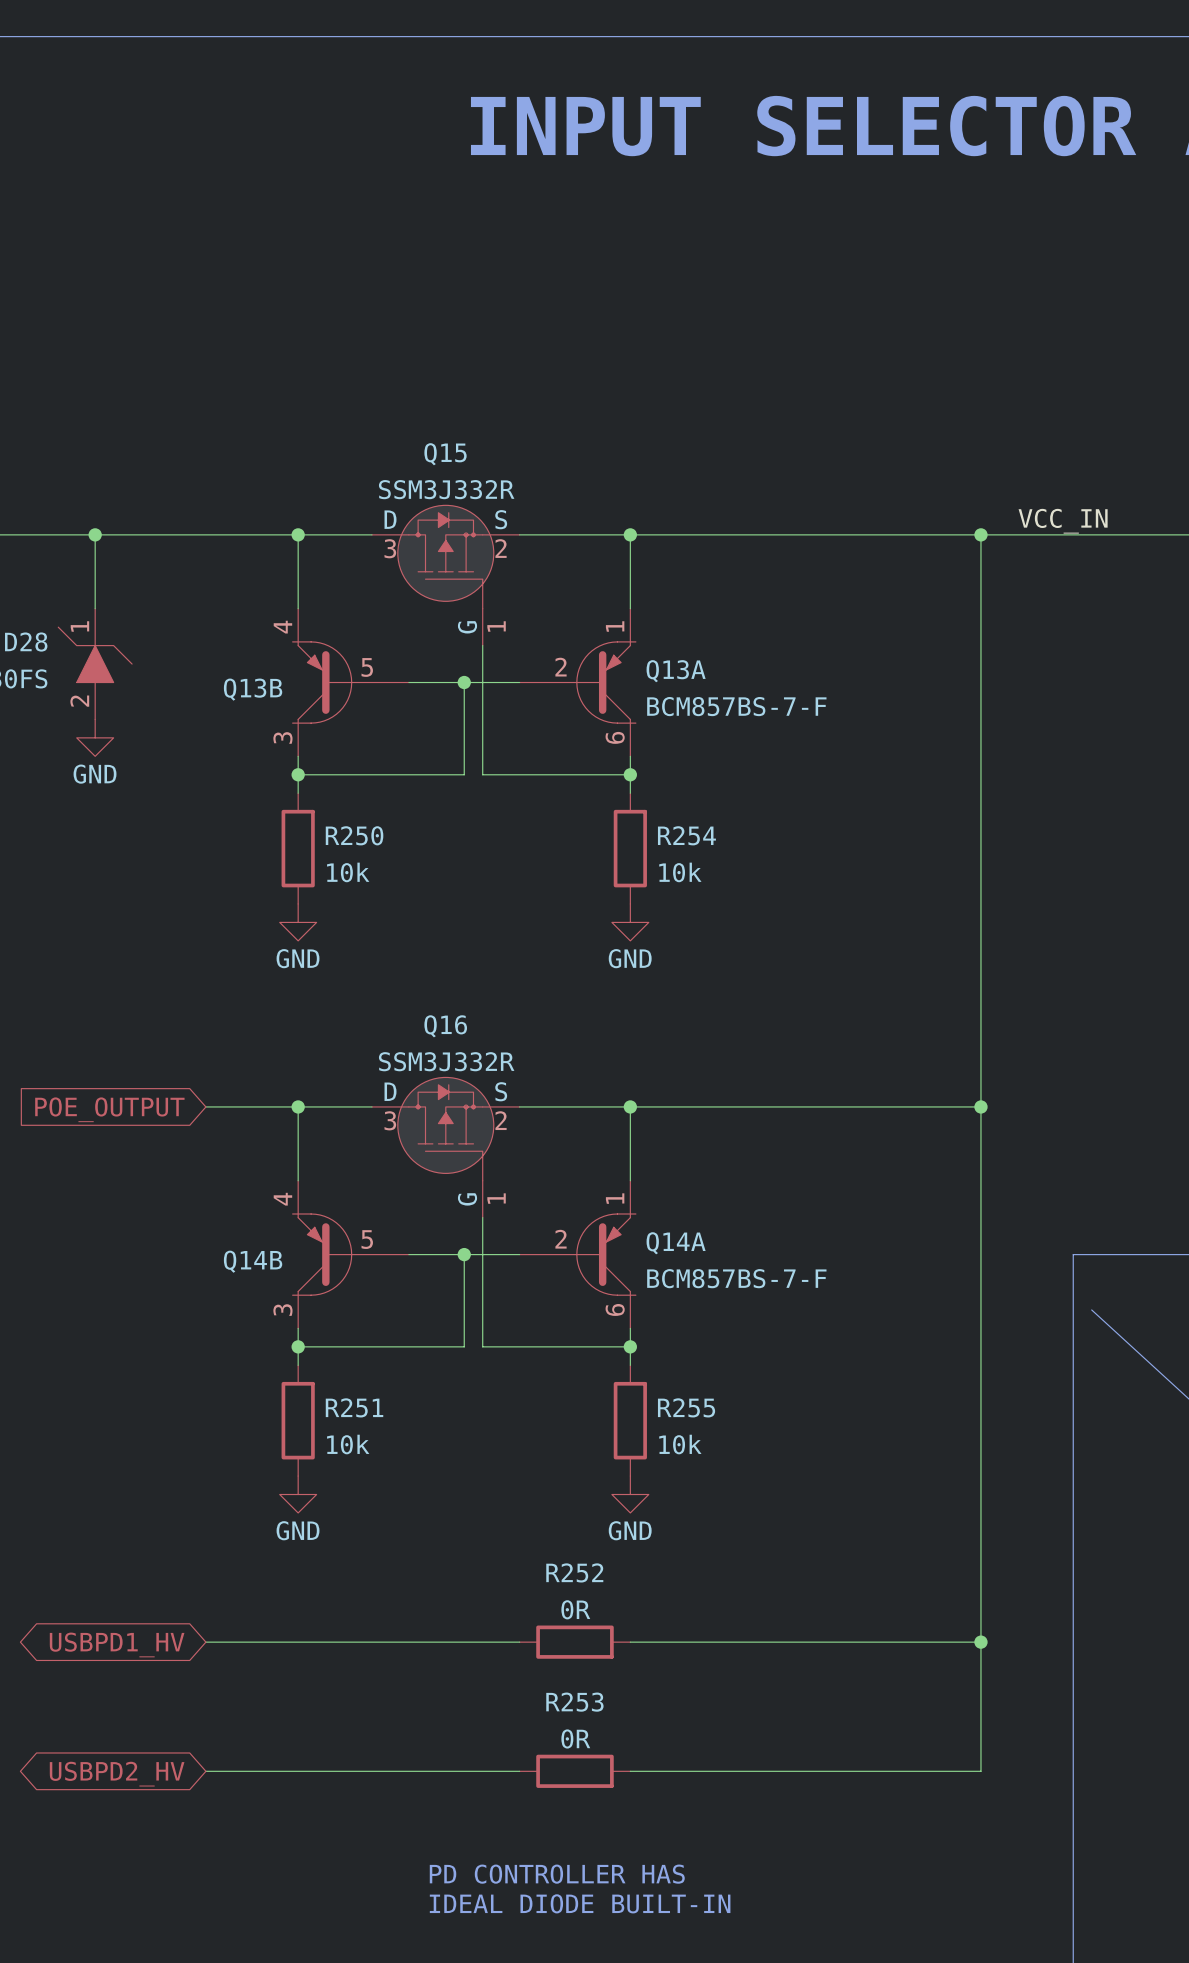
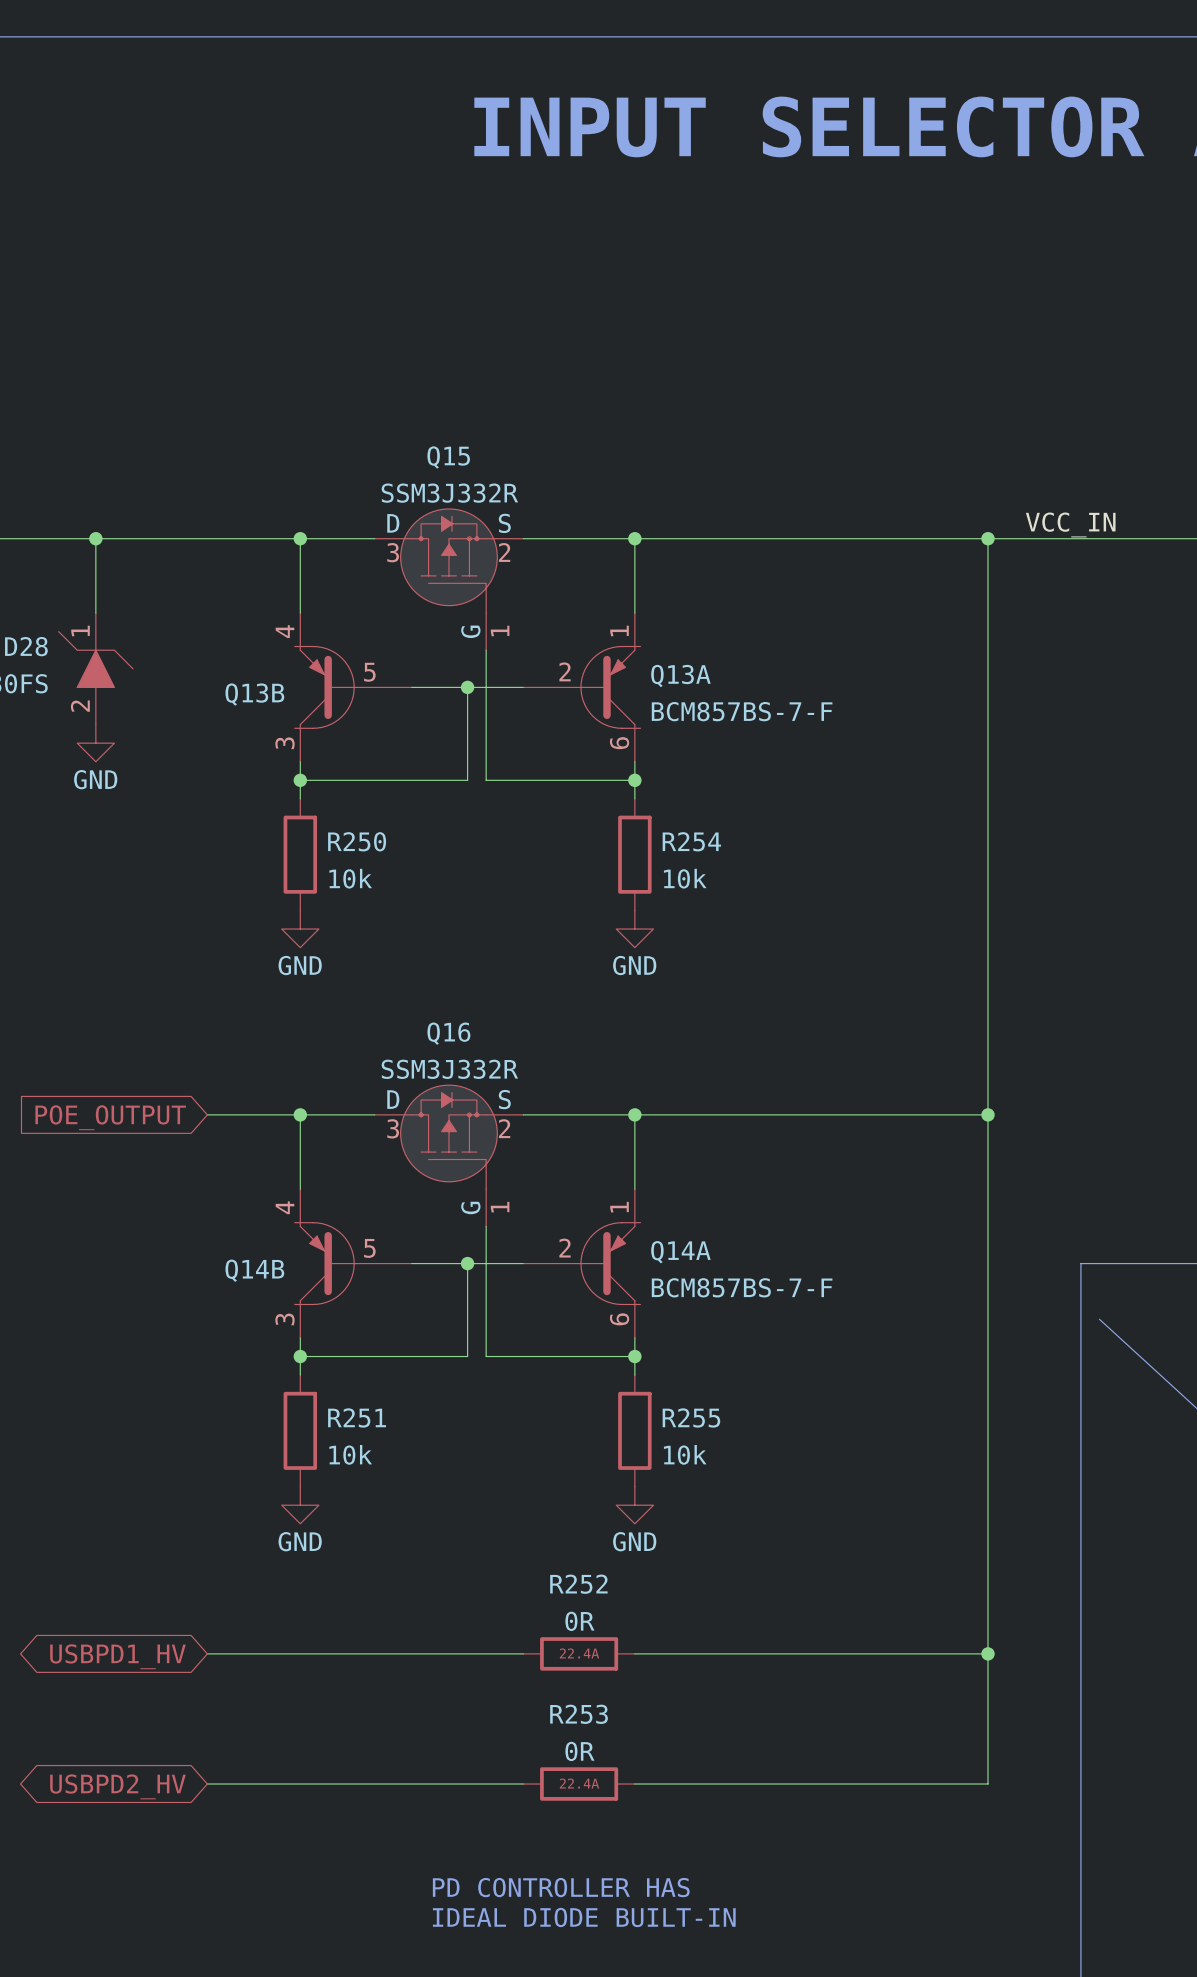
R252 text: none -> 22.4A (579, 1653)
R253 text: none -> 22.4A (579, 1783)

